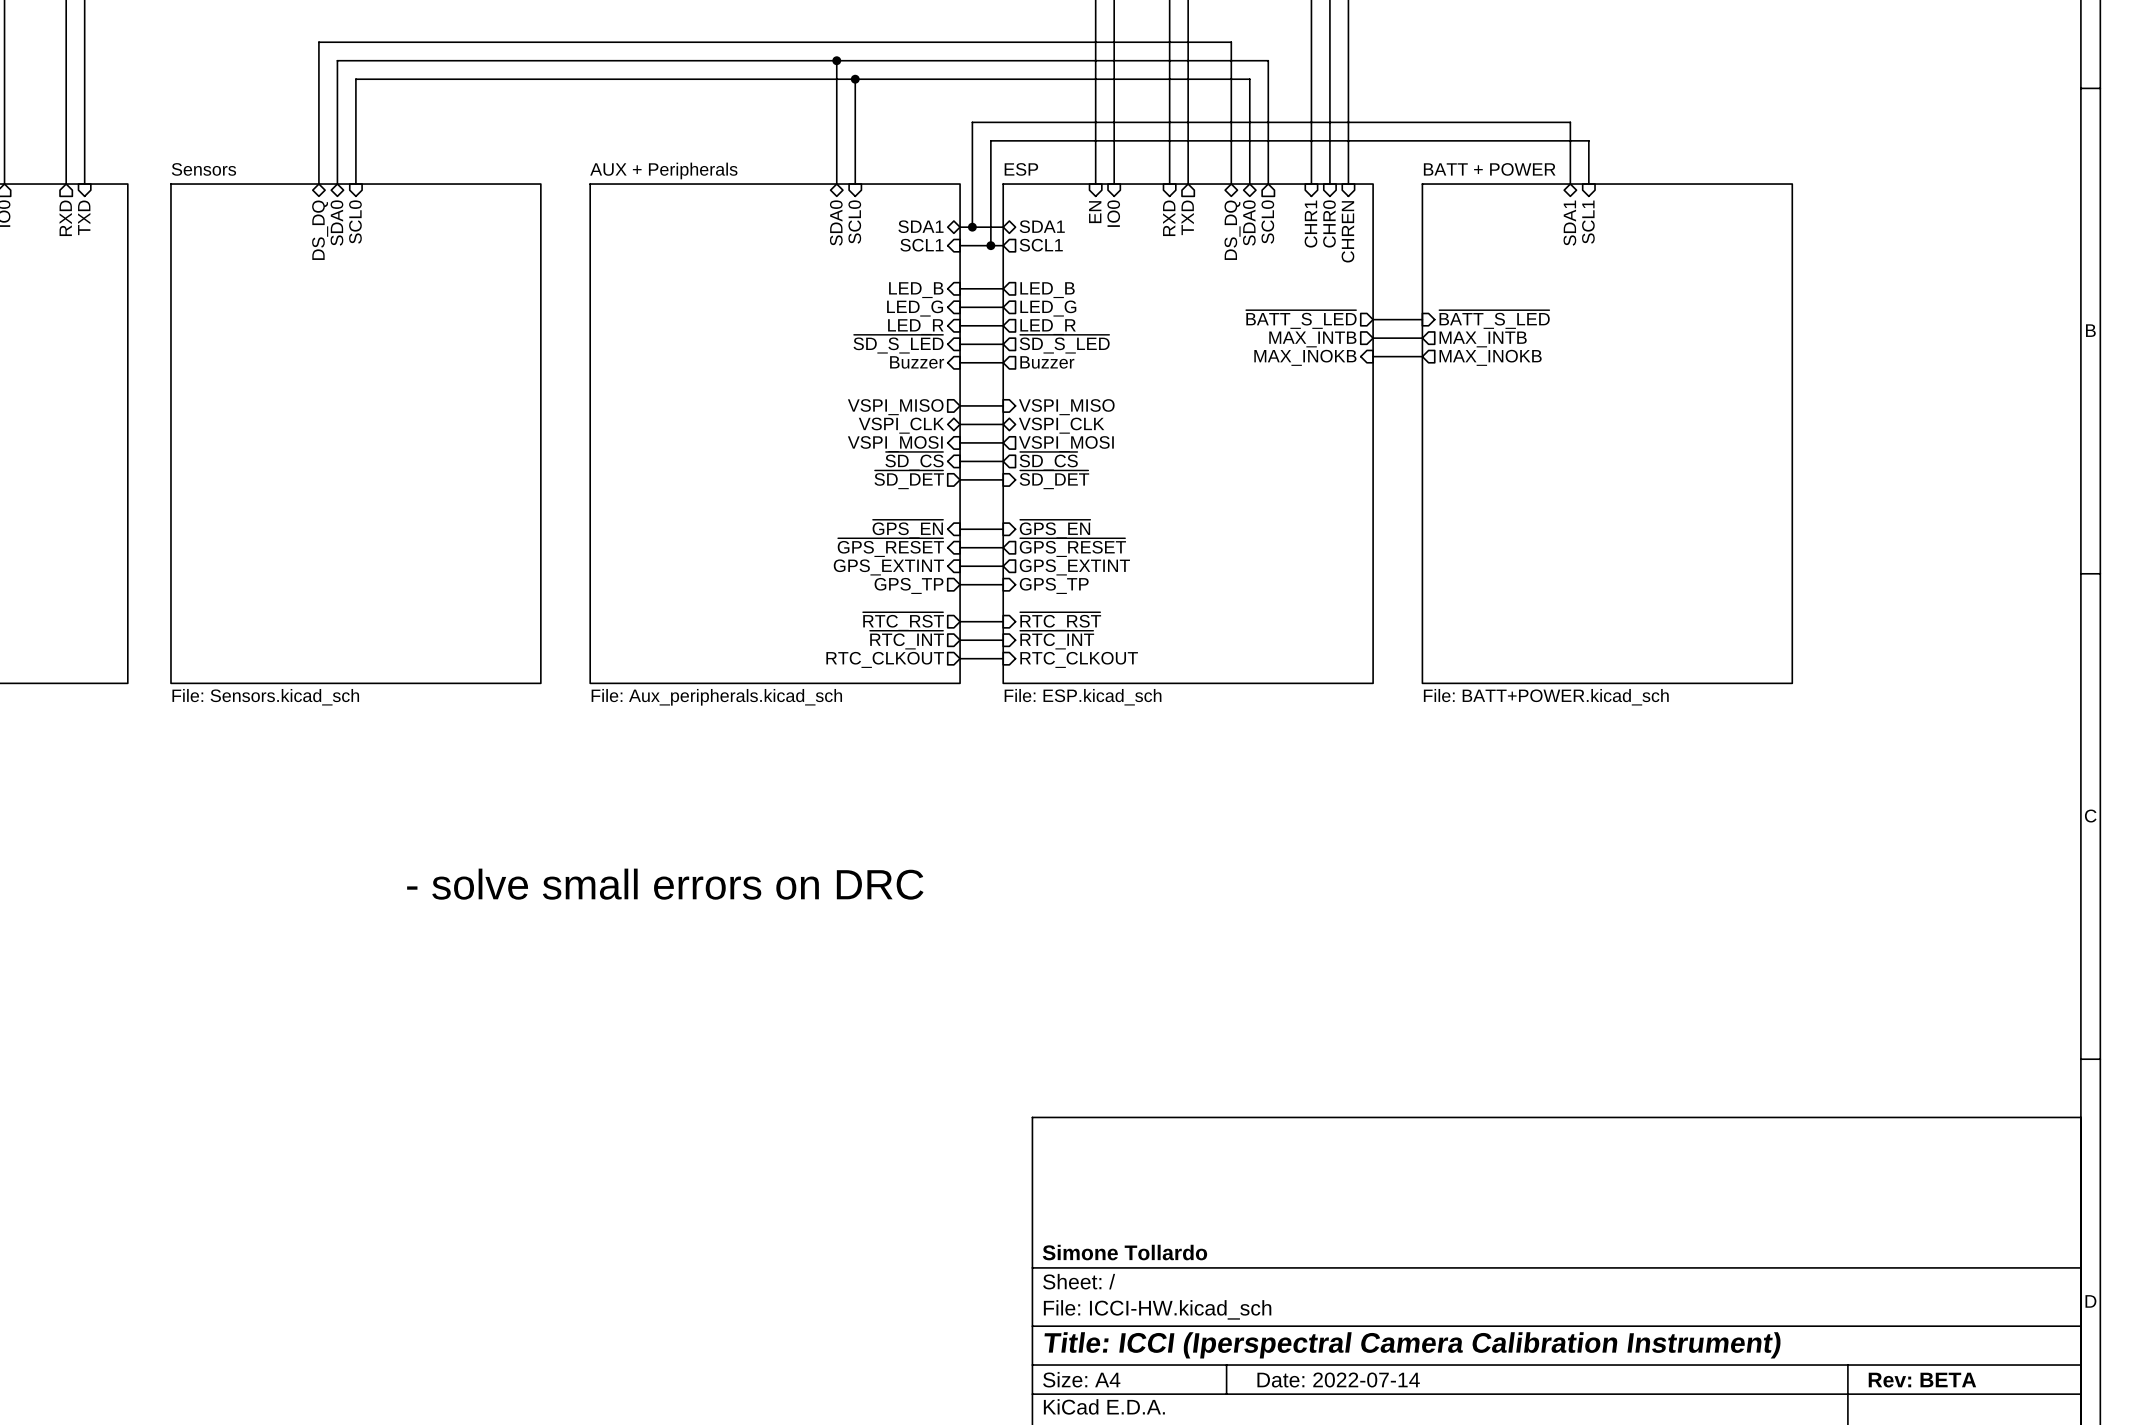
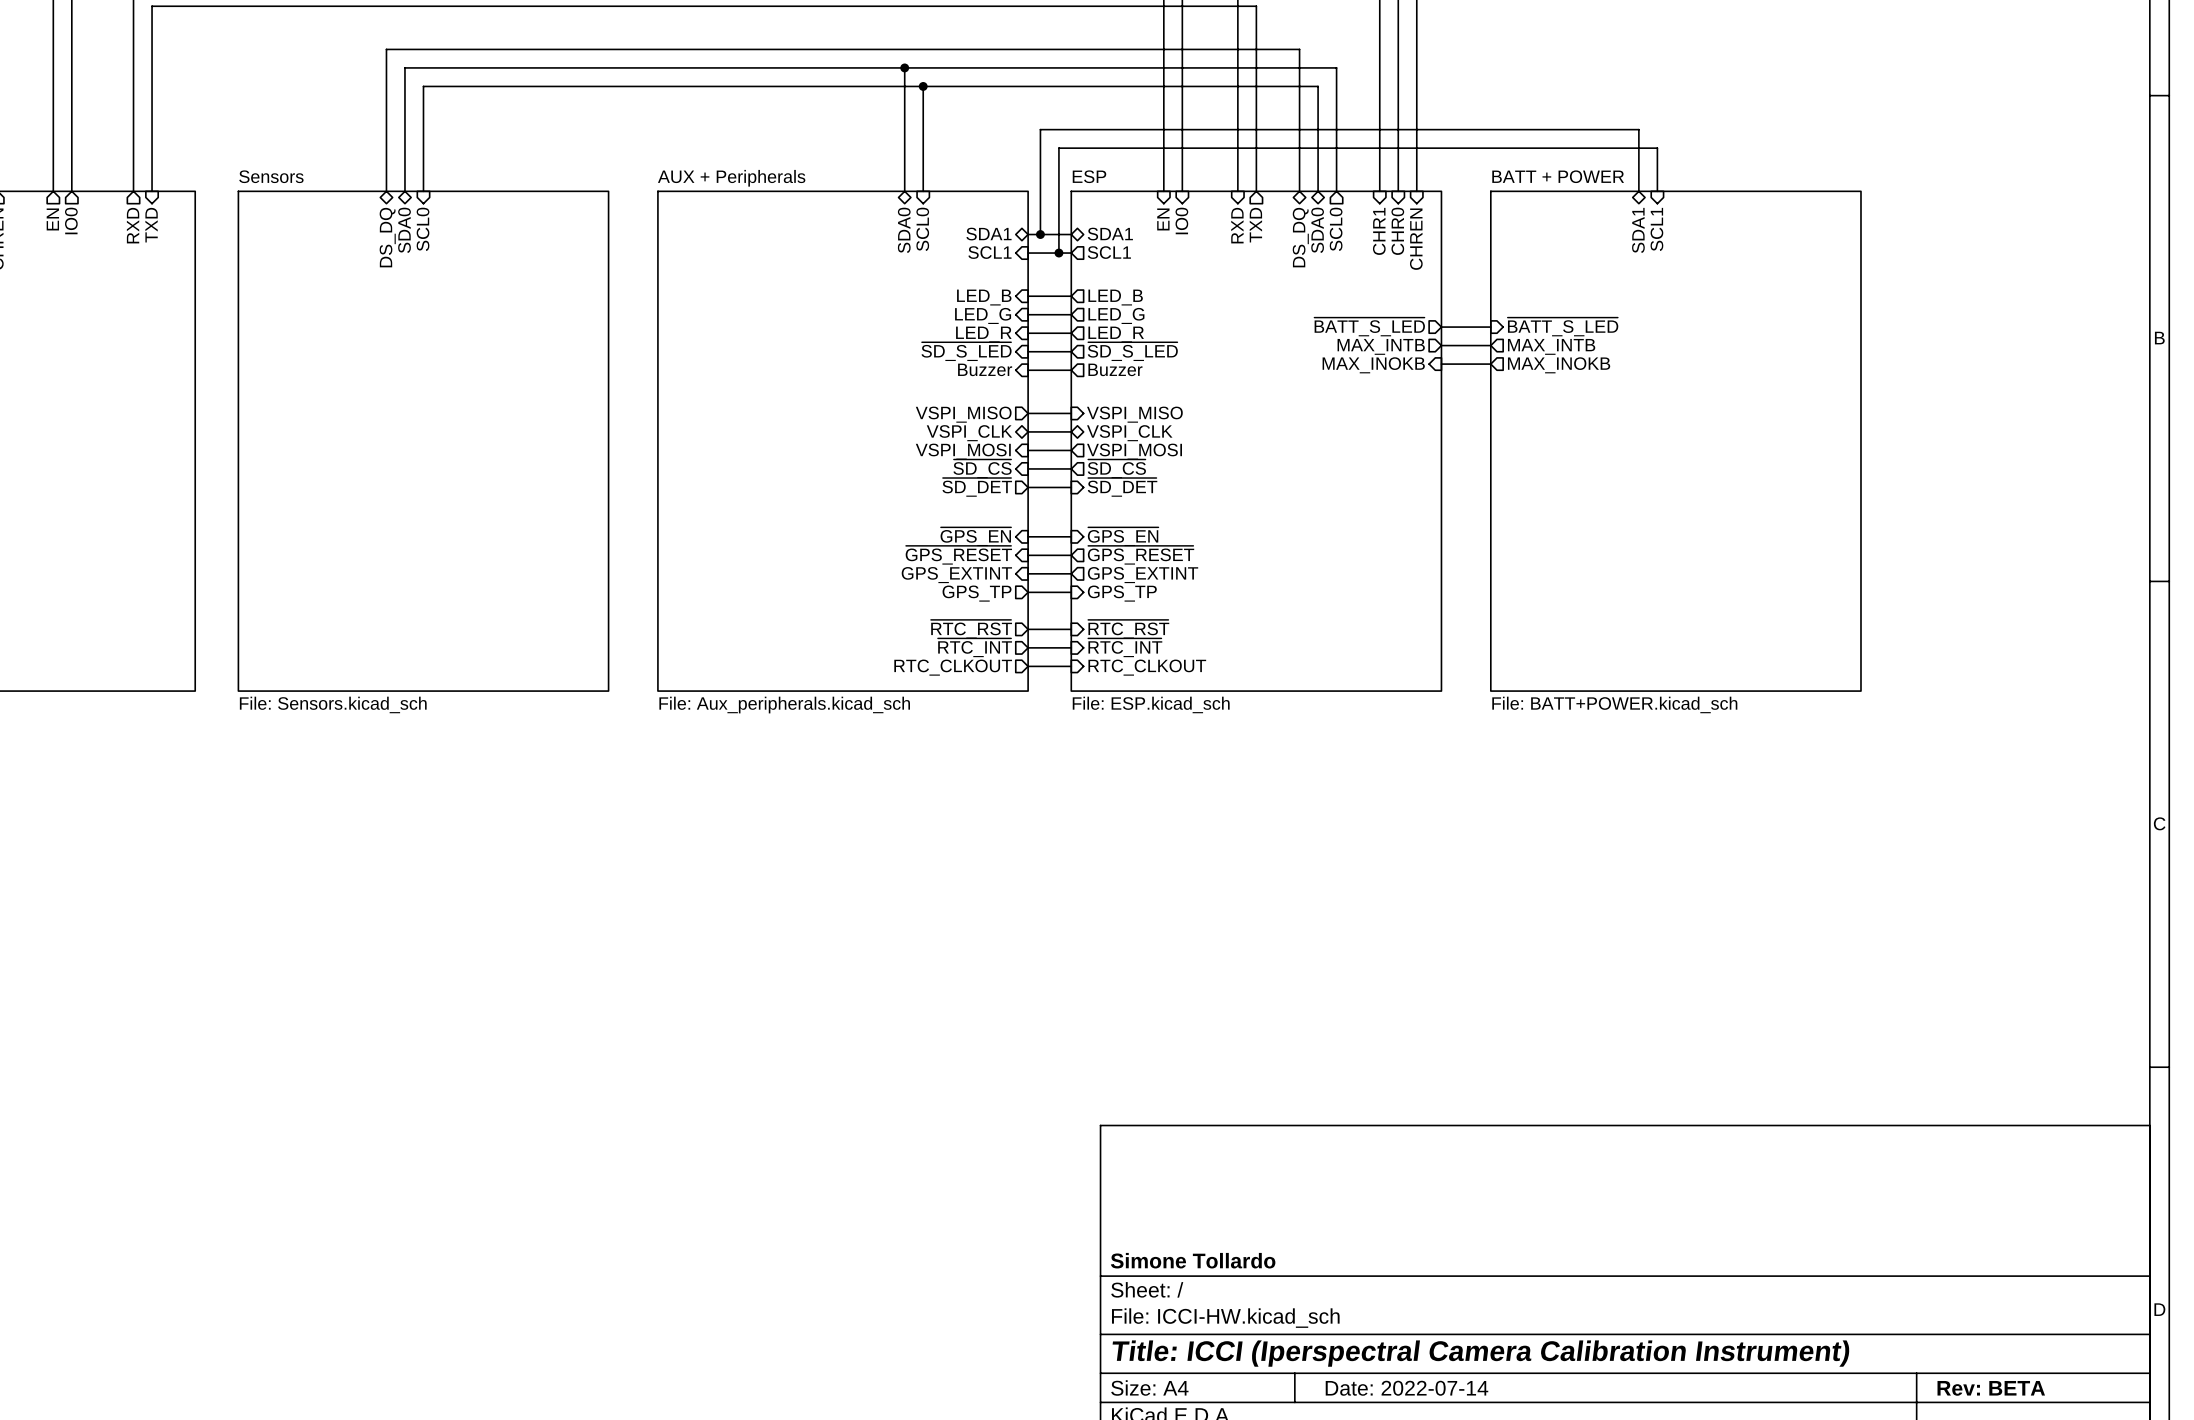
text: - solve small errors on DRC (665, 884) -> none

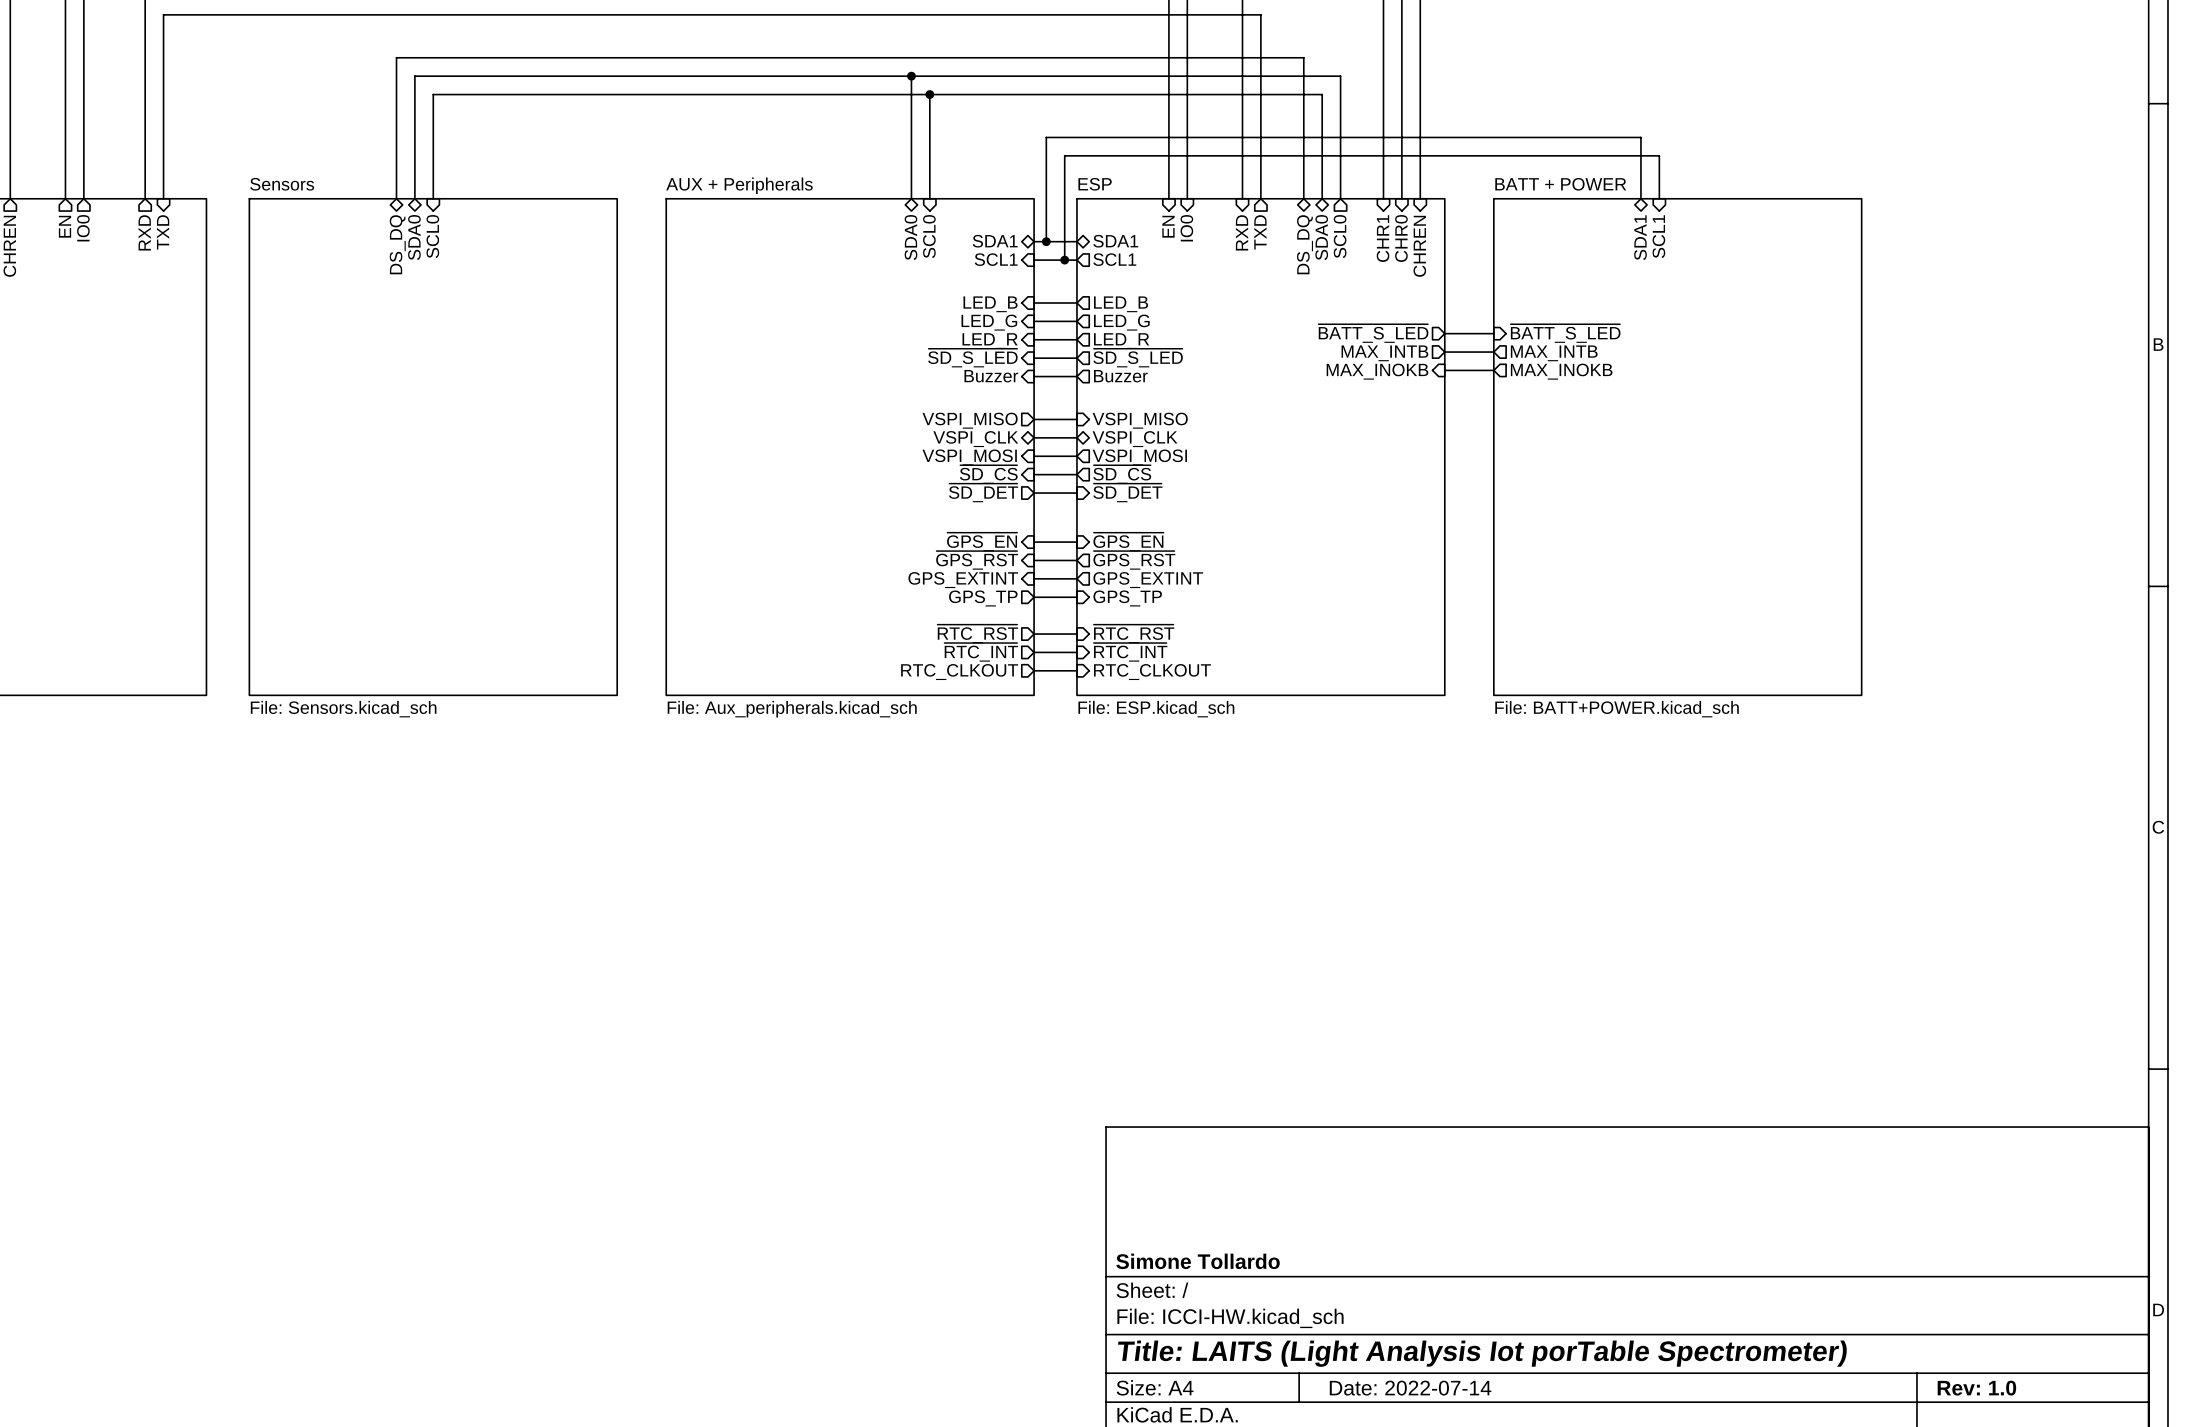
sheet pin: ~{GPS_RESET} (958, 555) -> ~{GPS_RST} (977, 560)
sheet pin: ~{GPS_RESET} (1141, 555) -> ~{GPS_RST} (1134, 560)
title block: Title: ICCI (Iperspectral Camera Calibration Instrument) (1481, 1353) -> Title: LAITS (Light Analysis Iot porTable Spectrometer) (1482, 1353)
title block: Rev: BETA (1991, 1388) -> Rev: 1.0 (1976, 1388)

